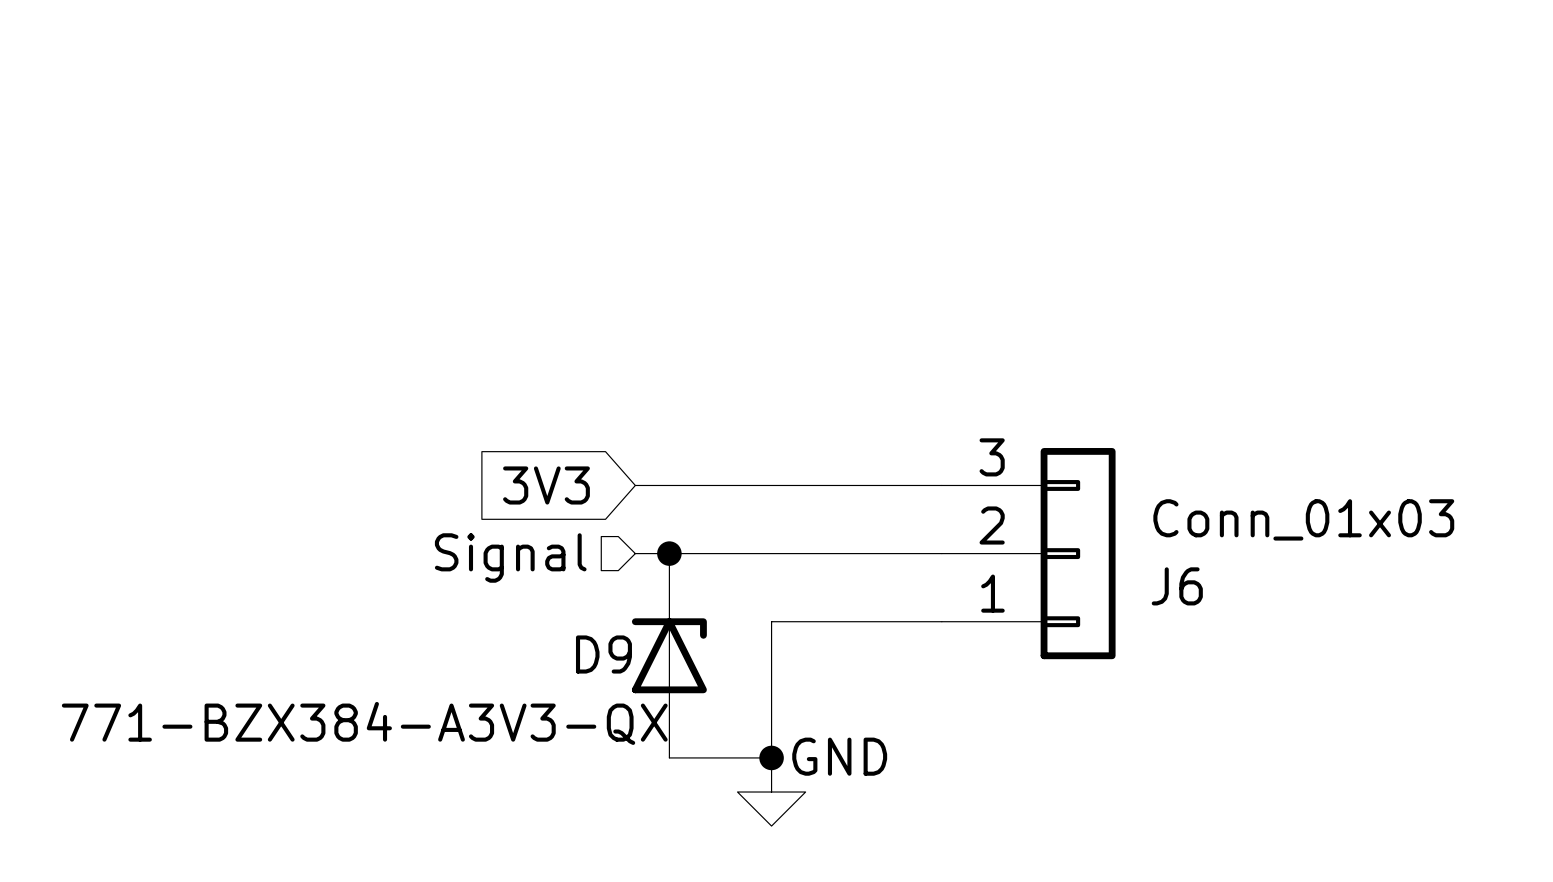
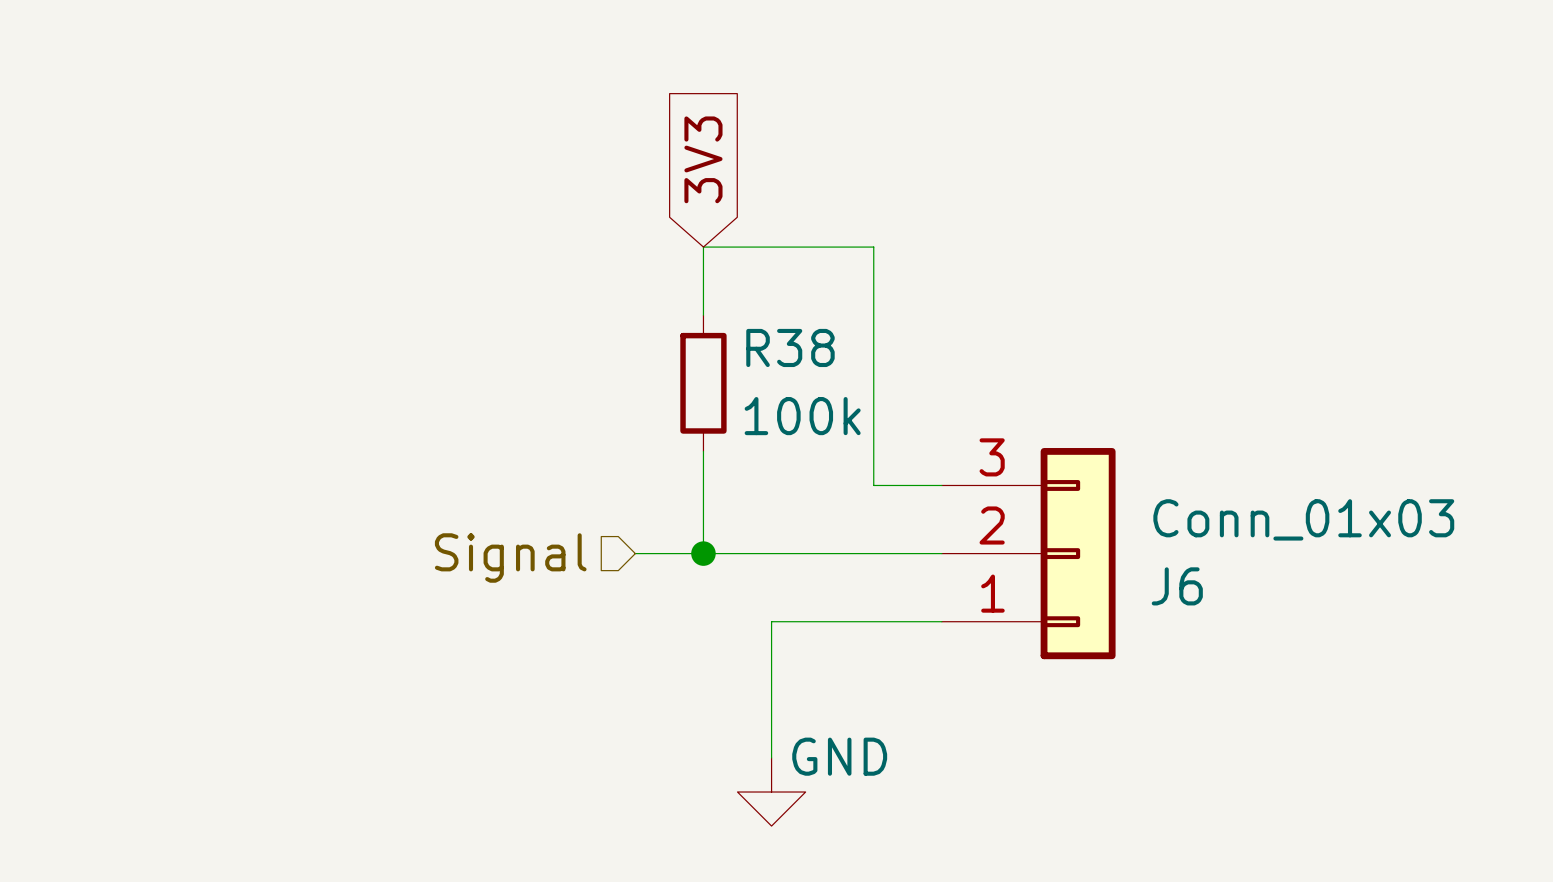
R38: none -> 100k (703, 383)
wire: none -> (703, 451) (703, 553)
global label rotation: 0° (546, 485) -> 90° clockwise (703, 159)
global label position: 3V3 (546, 485) -> 3V3 (703, 159)
wire: (635, 485) (873, 485) -> (703, 315) (703, 247) (873, 247) (873, 485)
junction position: (669, 553) -> (703, 553)
D9: 771-BZX384-A3V3-QX (669, 655) -> none
wire: (669, 757) (771, 757) -> none
junction: (771, 757) -> none

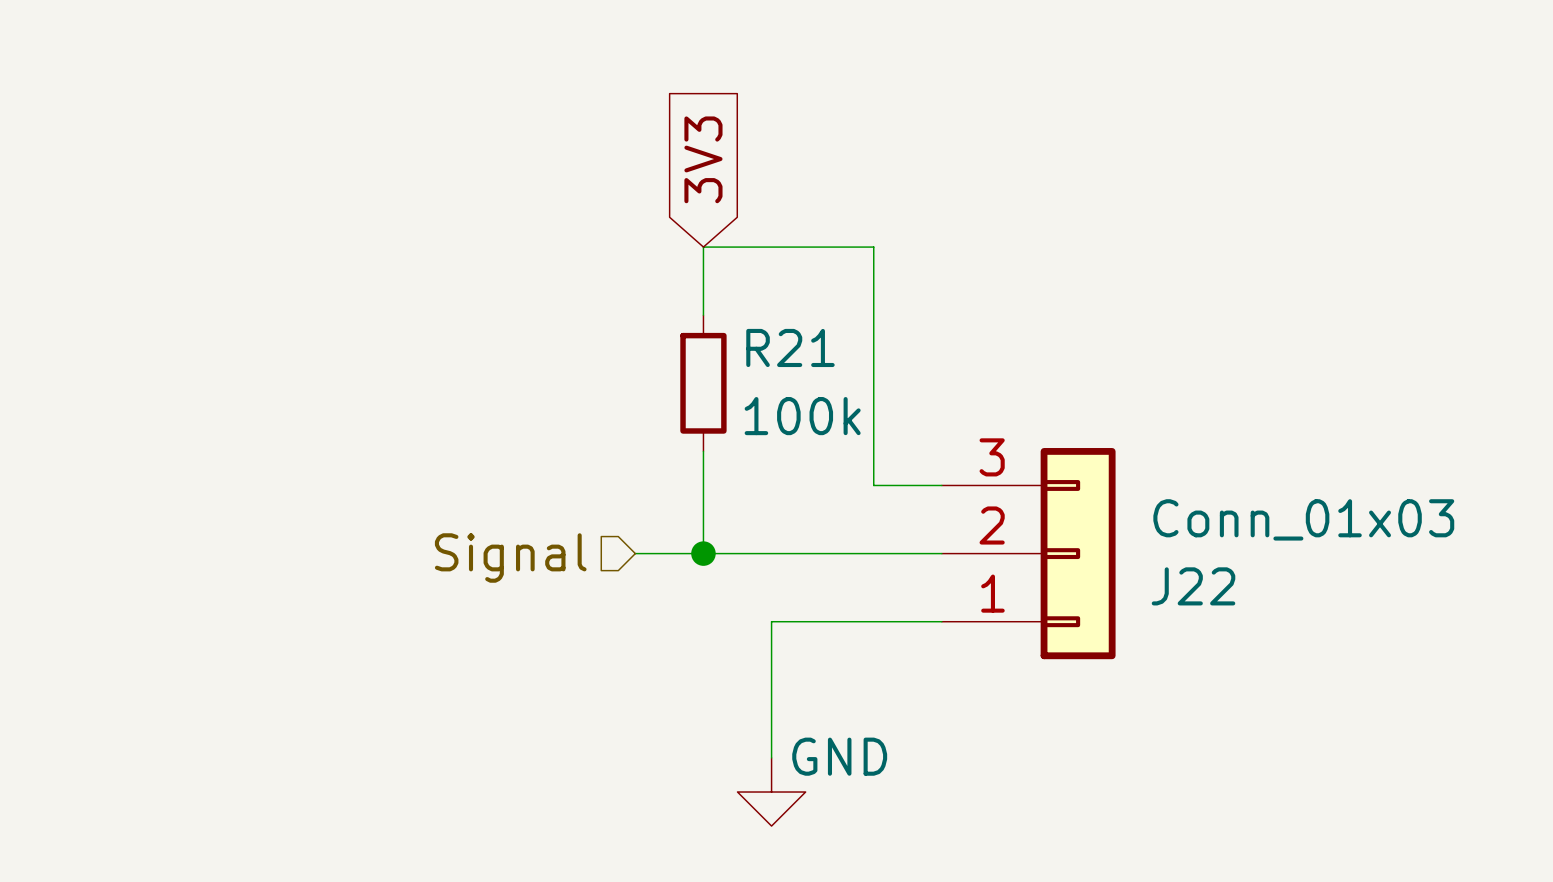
R38 name: R38 (790, 347) -> R21 (790, 347)
J6 name: J6 (1177, 586) -> J22 (1193, 586)

